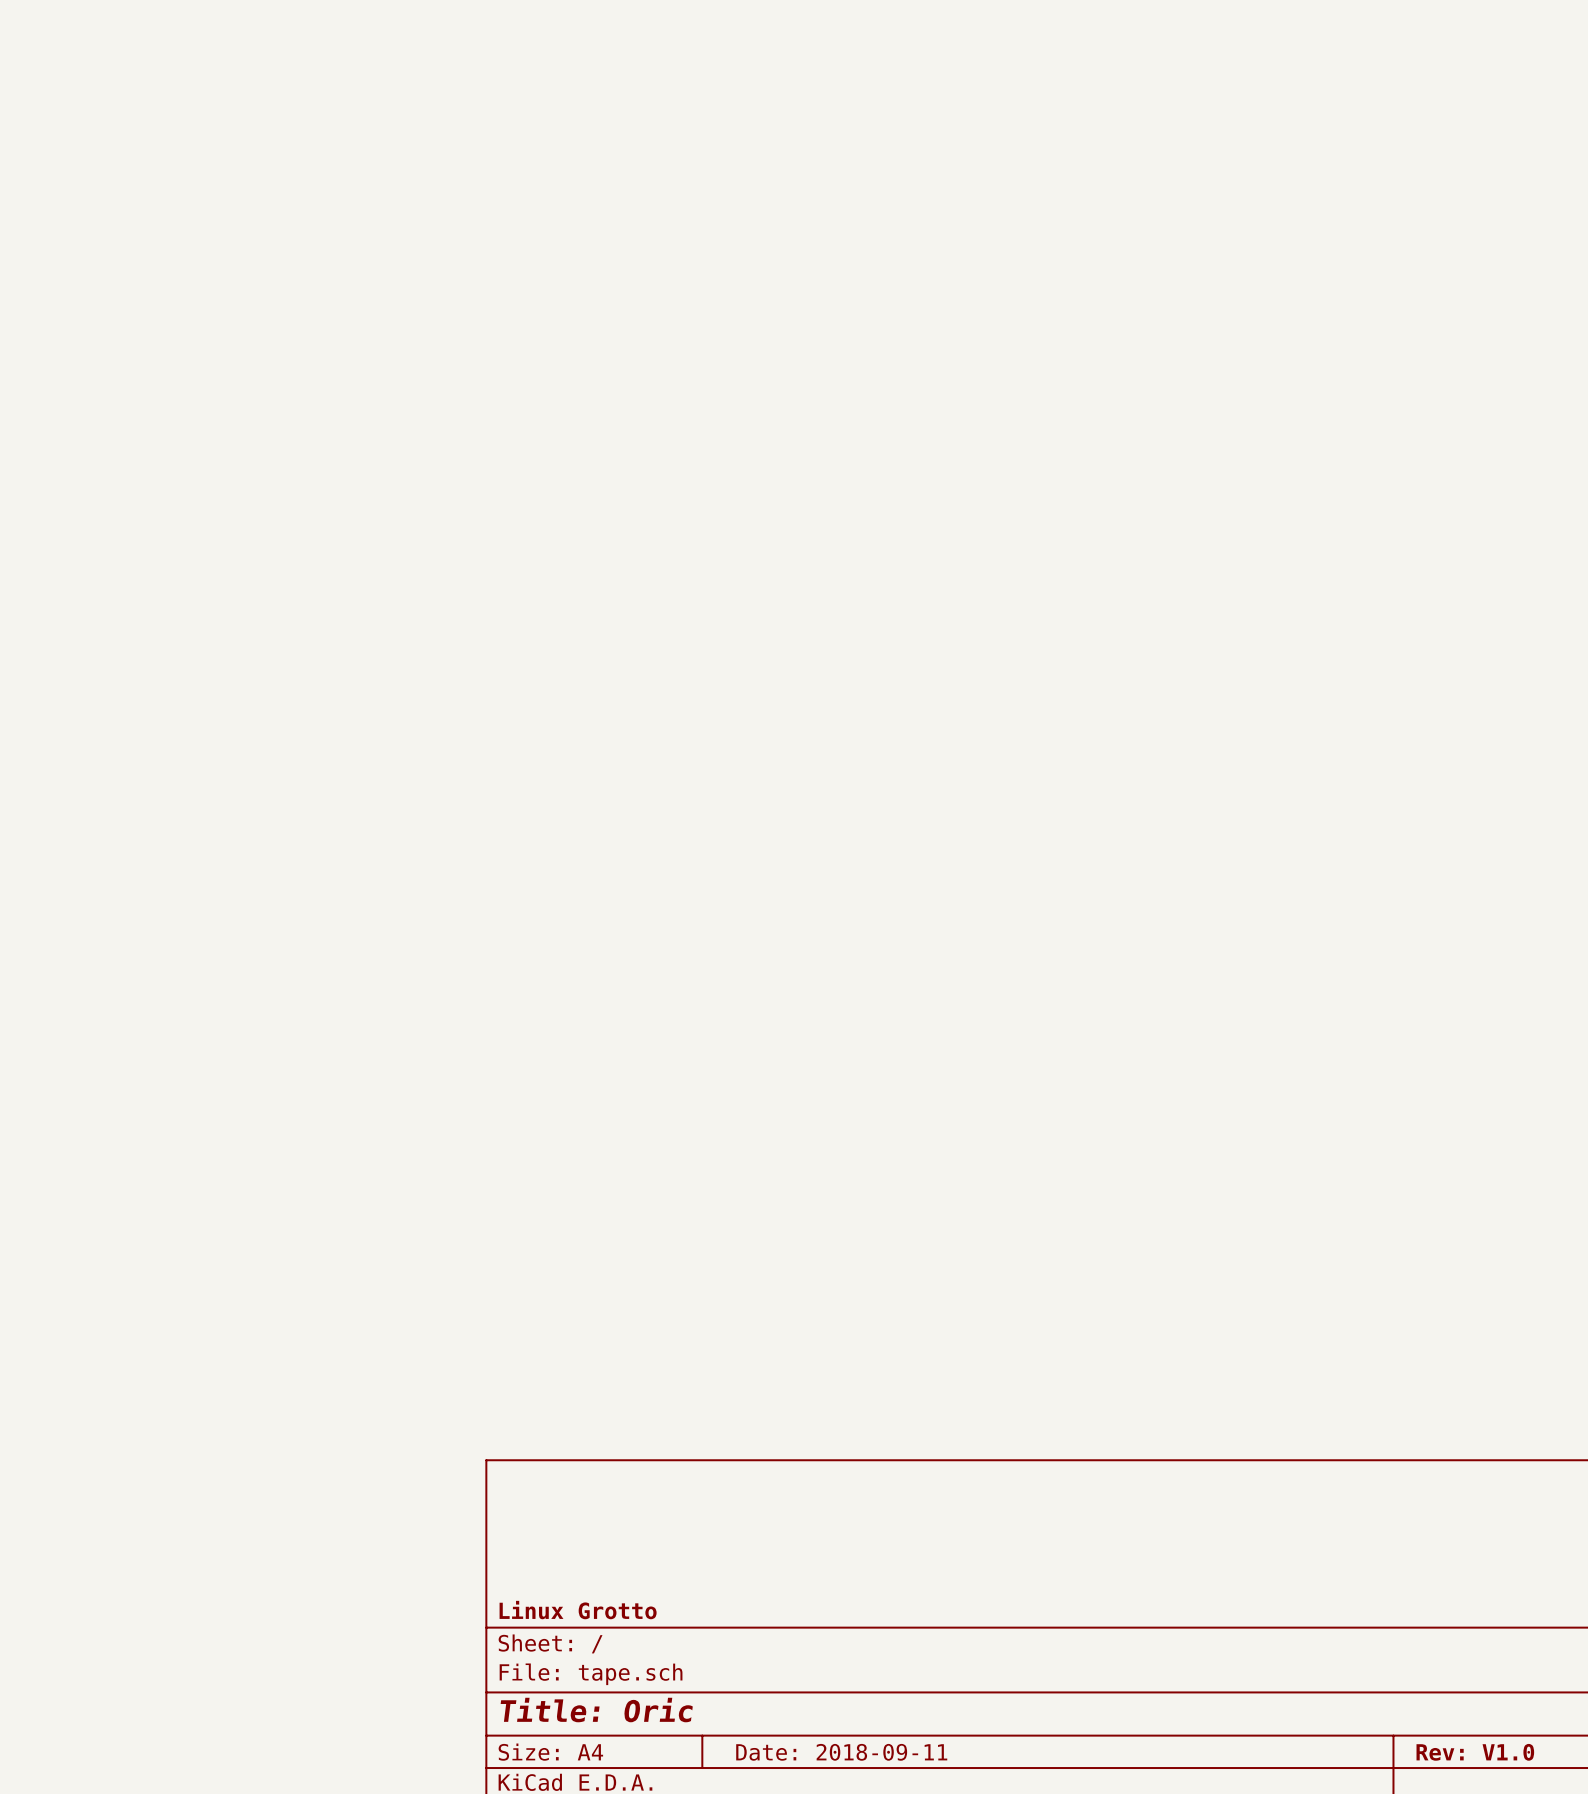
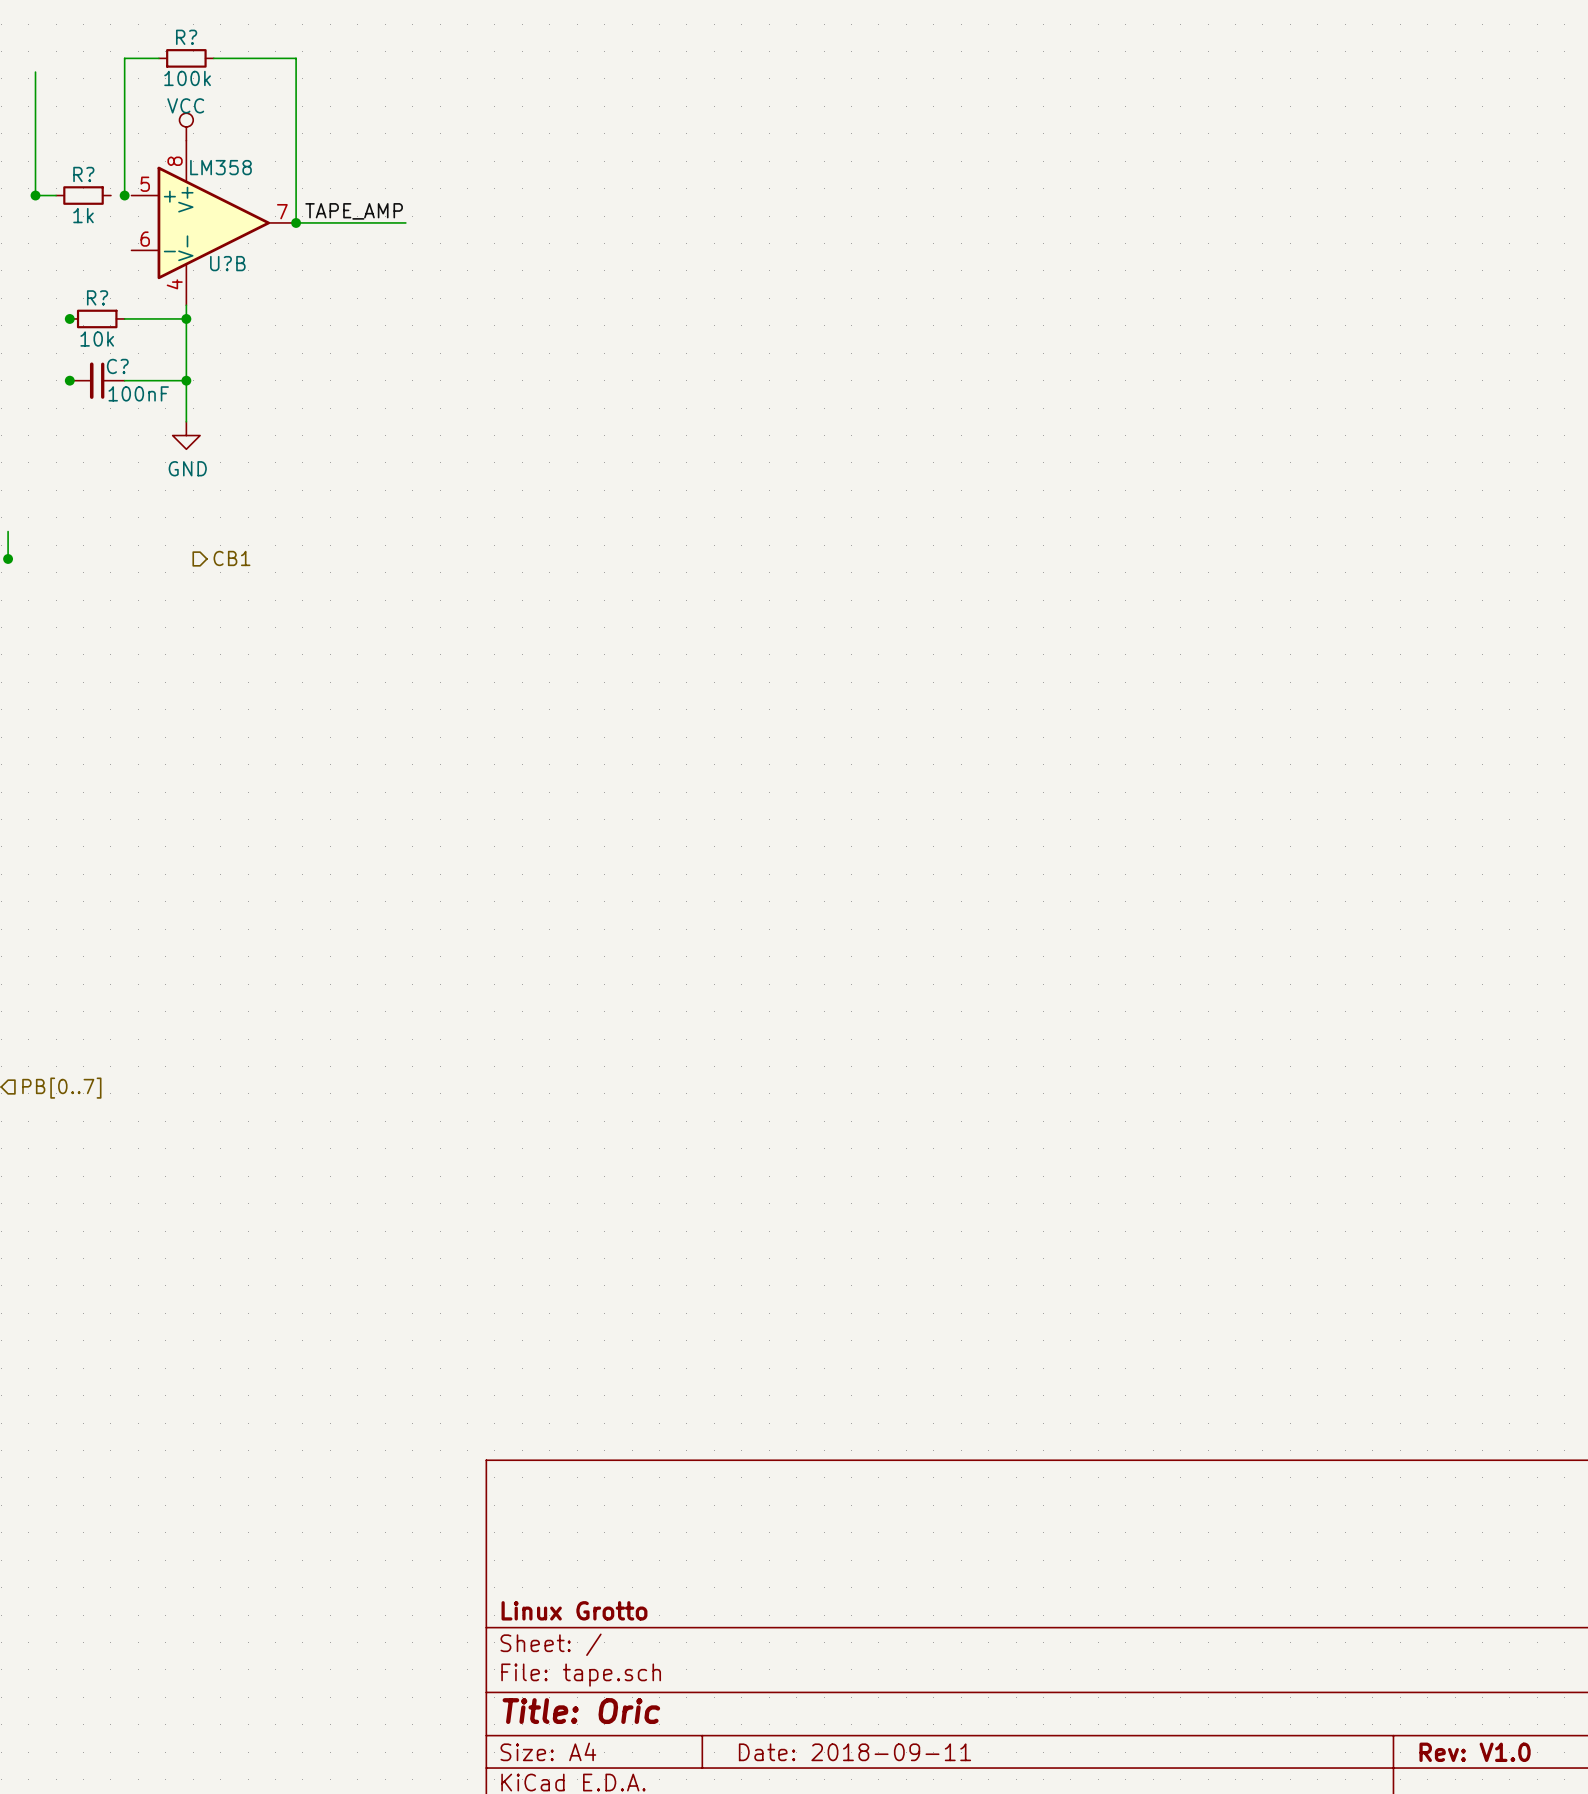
wire: none -> (158, 58) (124, 58) (124, 195)
R?: none -> 100k (186, 58)
wire: none -> (213, 58) (296, 58) (296, 222) (405, 222)
wire: none -> (35, 72) (35, 195) (56, 195)
power symbol: none -> VCC (186, 126)
junction: none -> (35, 195)
R?: none -> 1k (83, 195)
junction: none -> (124, 195)
label: none -> TAPE_AMP (354, 211)
part: none -> (186, 222)
U?B: none -> LM358 (213, 222)
junction: none -> (296, 222)
wire: none -> (186, 305) (186, 421)
junction: none -> (69, 318)
R?: none -> 10k (97, 318)
wire: none -> (124, 318) (186, 318)
junction: none -> (186, 318)
junction: none -> (69, 380)
C?: none -> 100nF (97, 380)
wire: none -> (124, 380) (186, 380)
junction: none -> (186, 380)
power symbol: none -> GND (186, 435)
wire: none -> (8, 531) (8, 558)
junction: none -> (8, 558)
hierarchical label: none -> CB1 (231, 558)
hierarchical label: none -> PB[0..7] (61, 1088)

